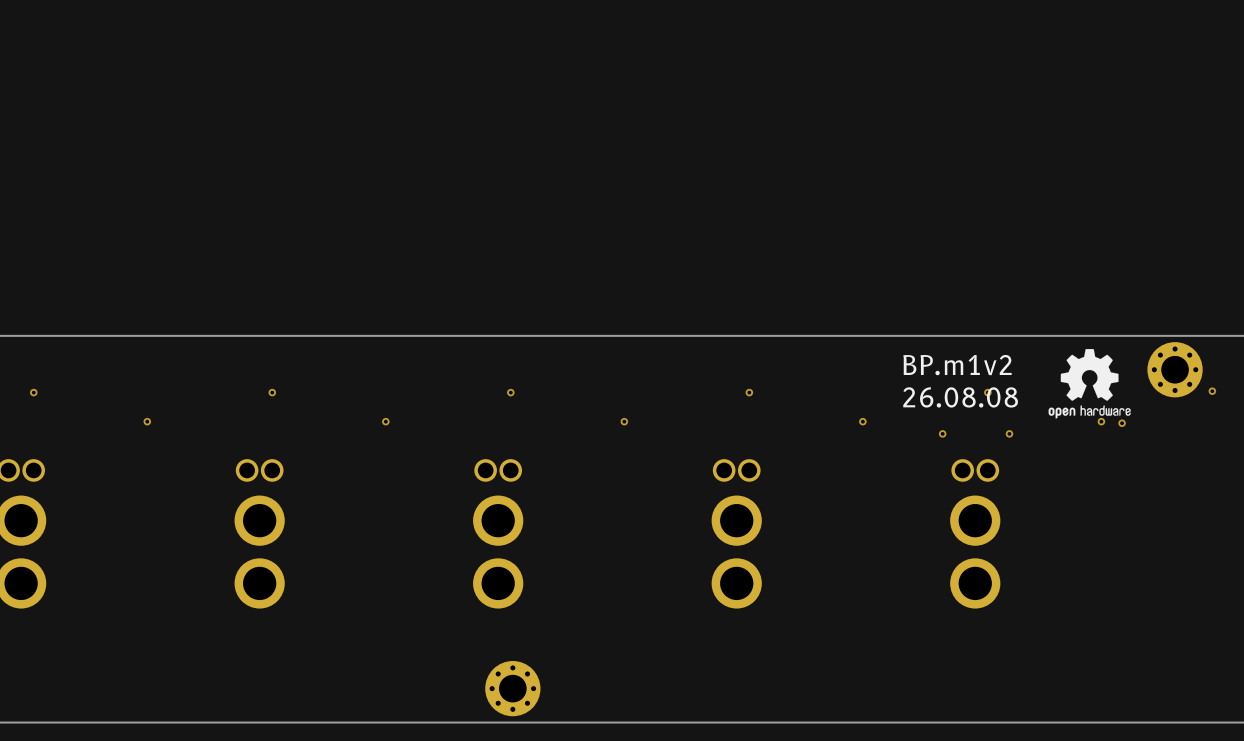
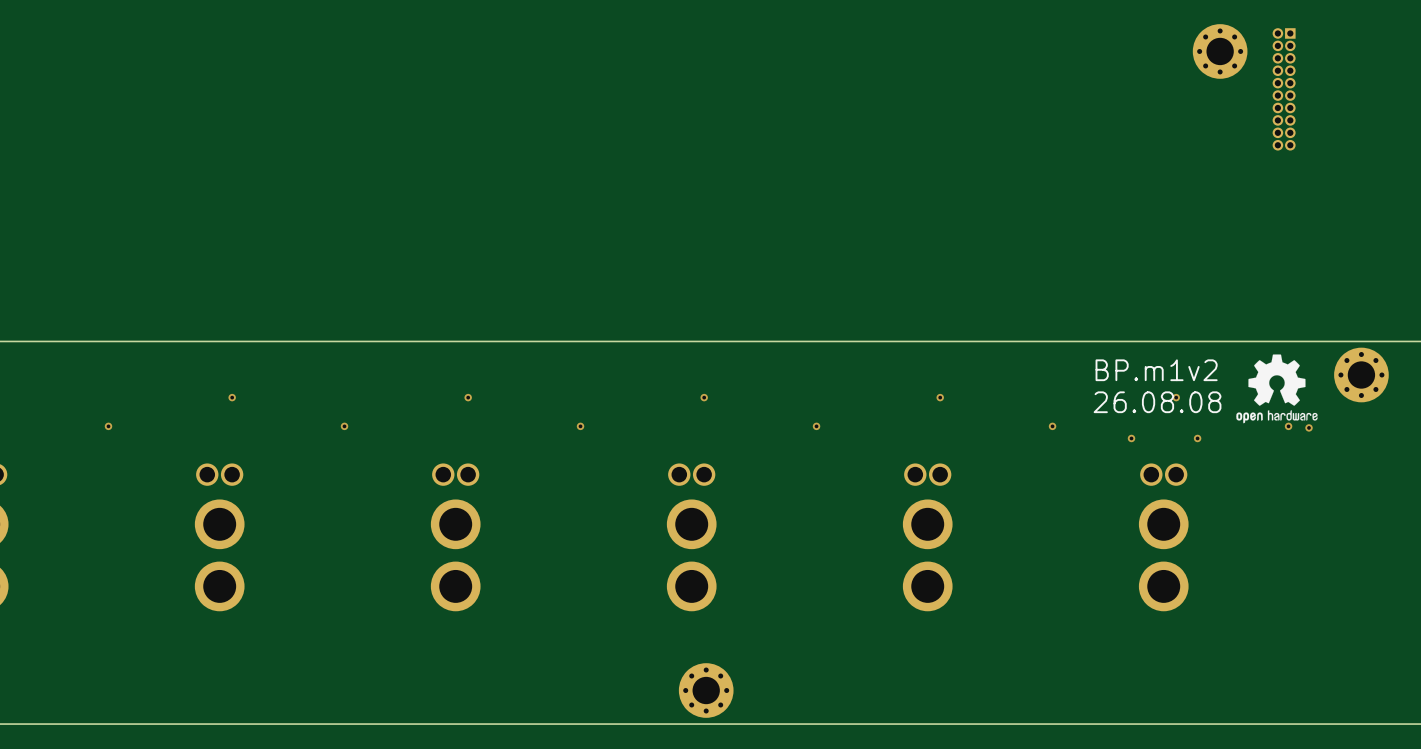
part: none -> (1220, 51)
part: none -> (1284, 89)
via: (1212, 391) -> none

